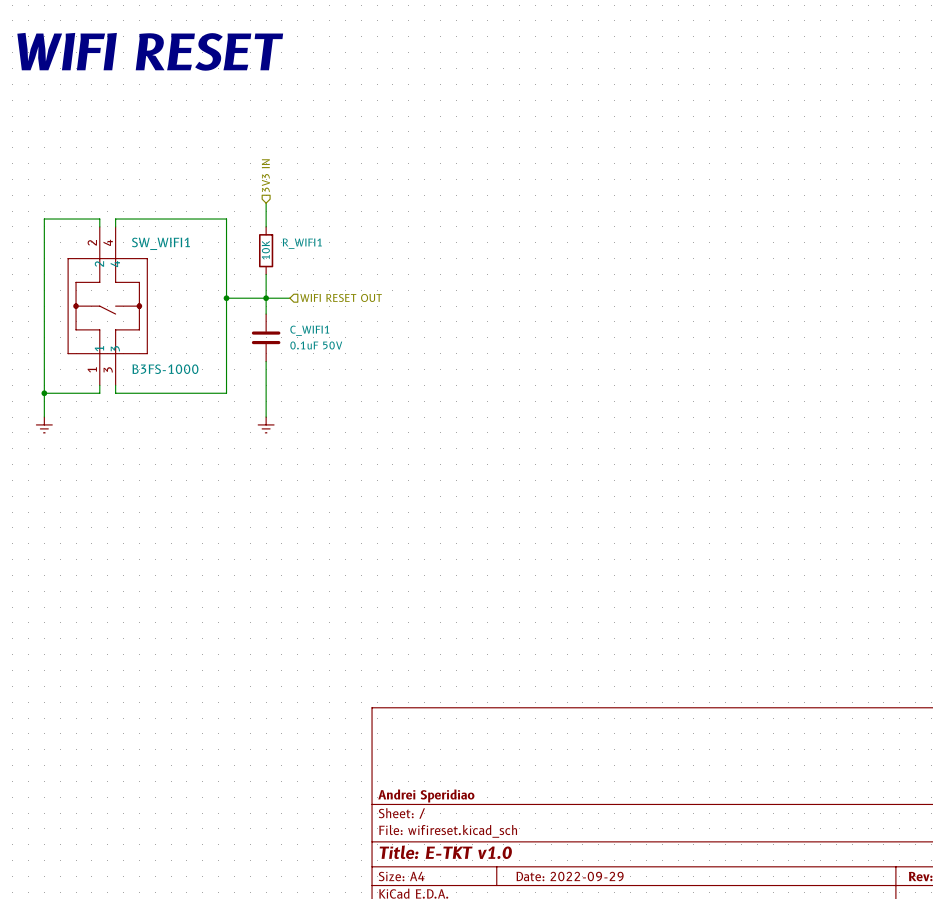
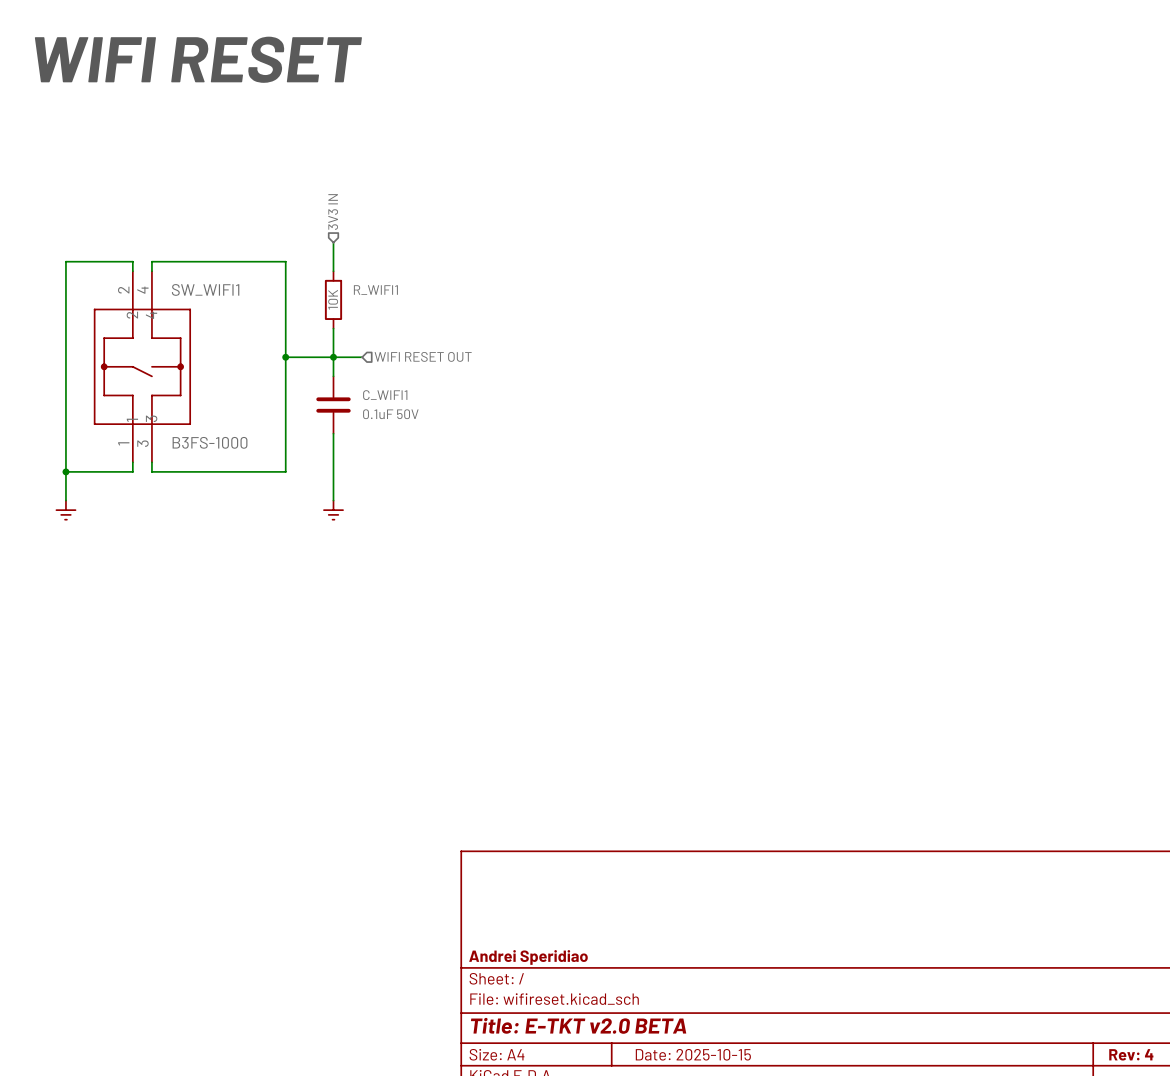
title block: Title: E-TKT v1.0 (445, 852) -> Title: E-TKT v2.0 BETA (578, 1025)
title block: Date: 2022-09-29 (570, 876) -> Date: 2025-10-15 (693, 1054)

